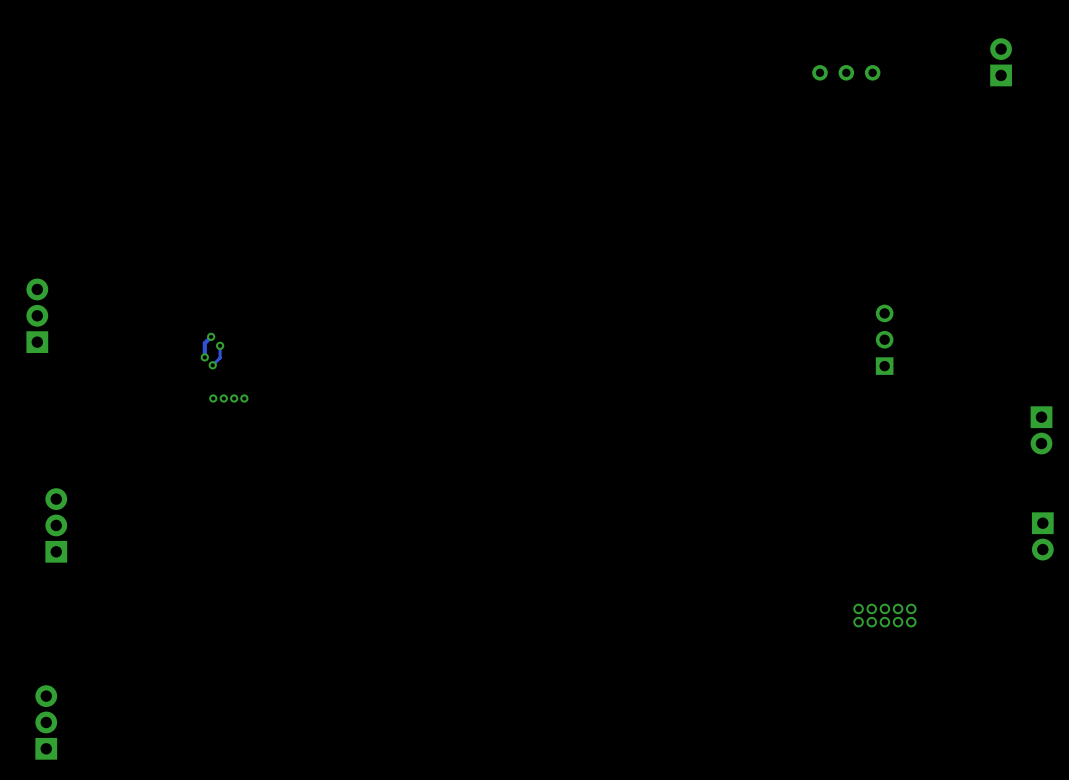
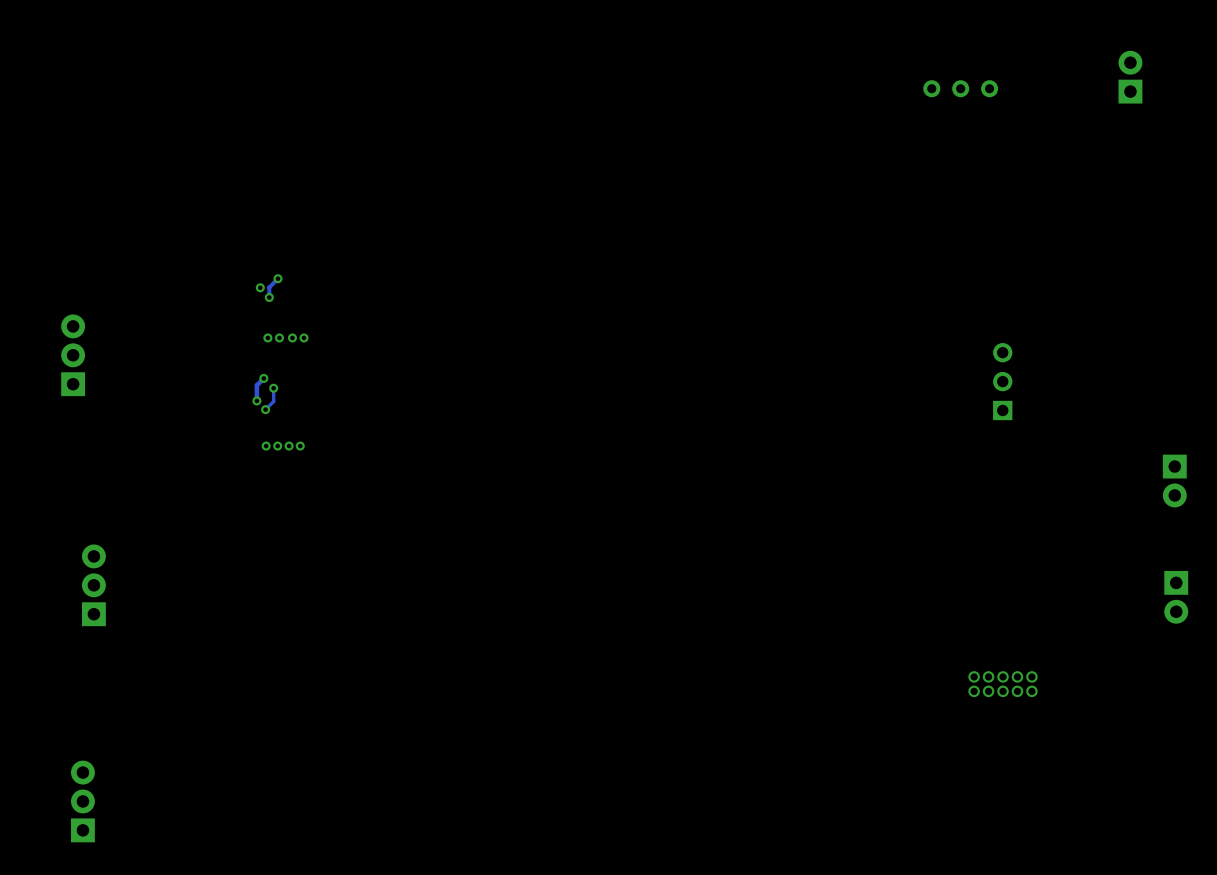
track: none -> (278, 278) (269, 287) (269, 297)
via: none -> (278, 278)
via: none -> (260, 287)
via: none -> (269, 297)
via: none -> (267, 337)
via: none -> (279, 337)
via: none -> (292, 337)
via: none -> (304, 337)

